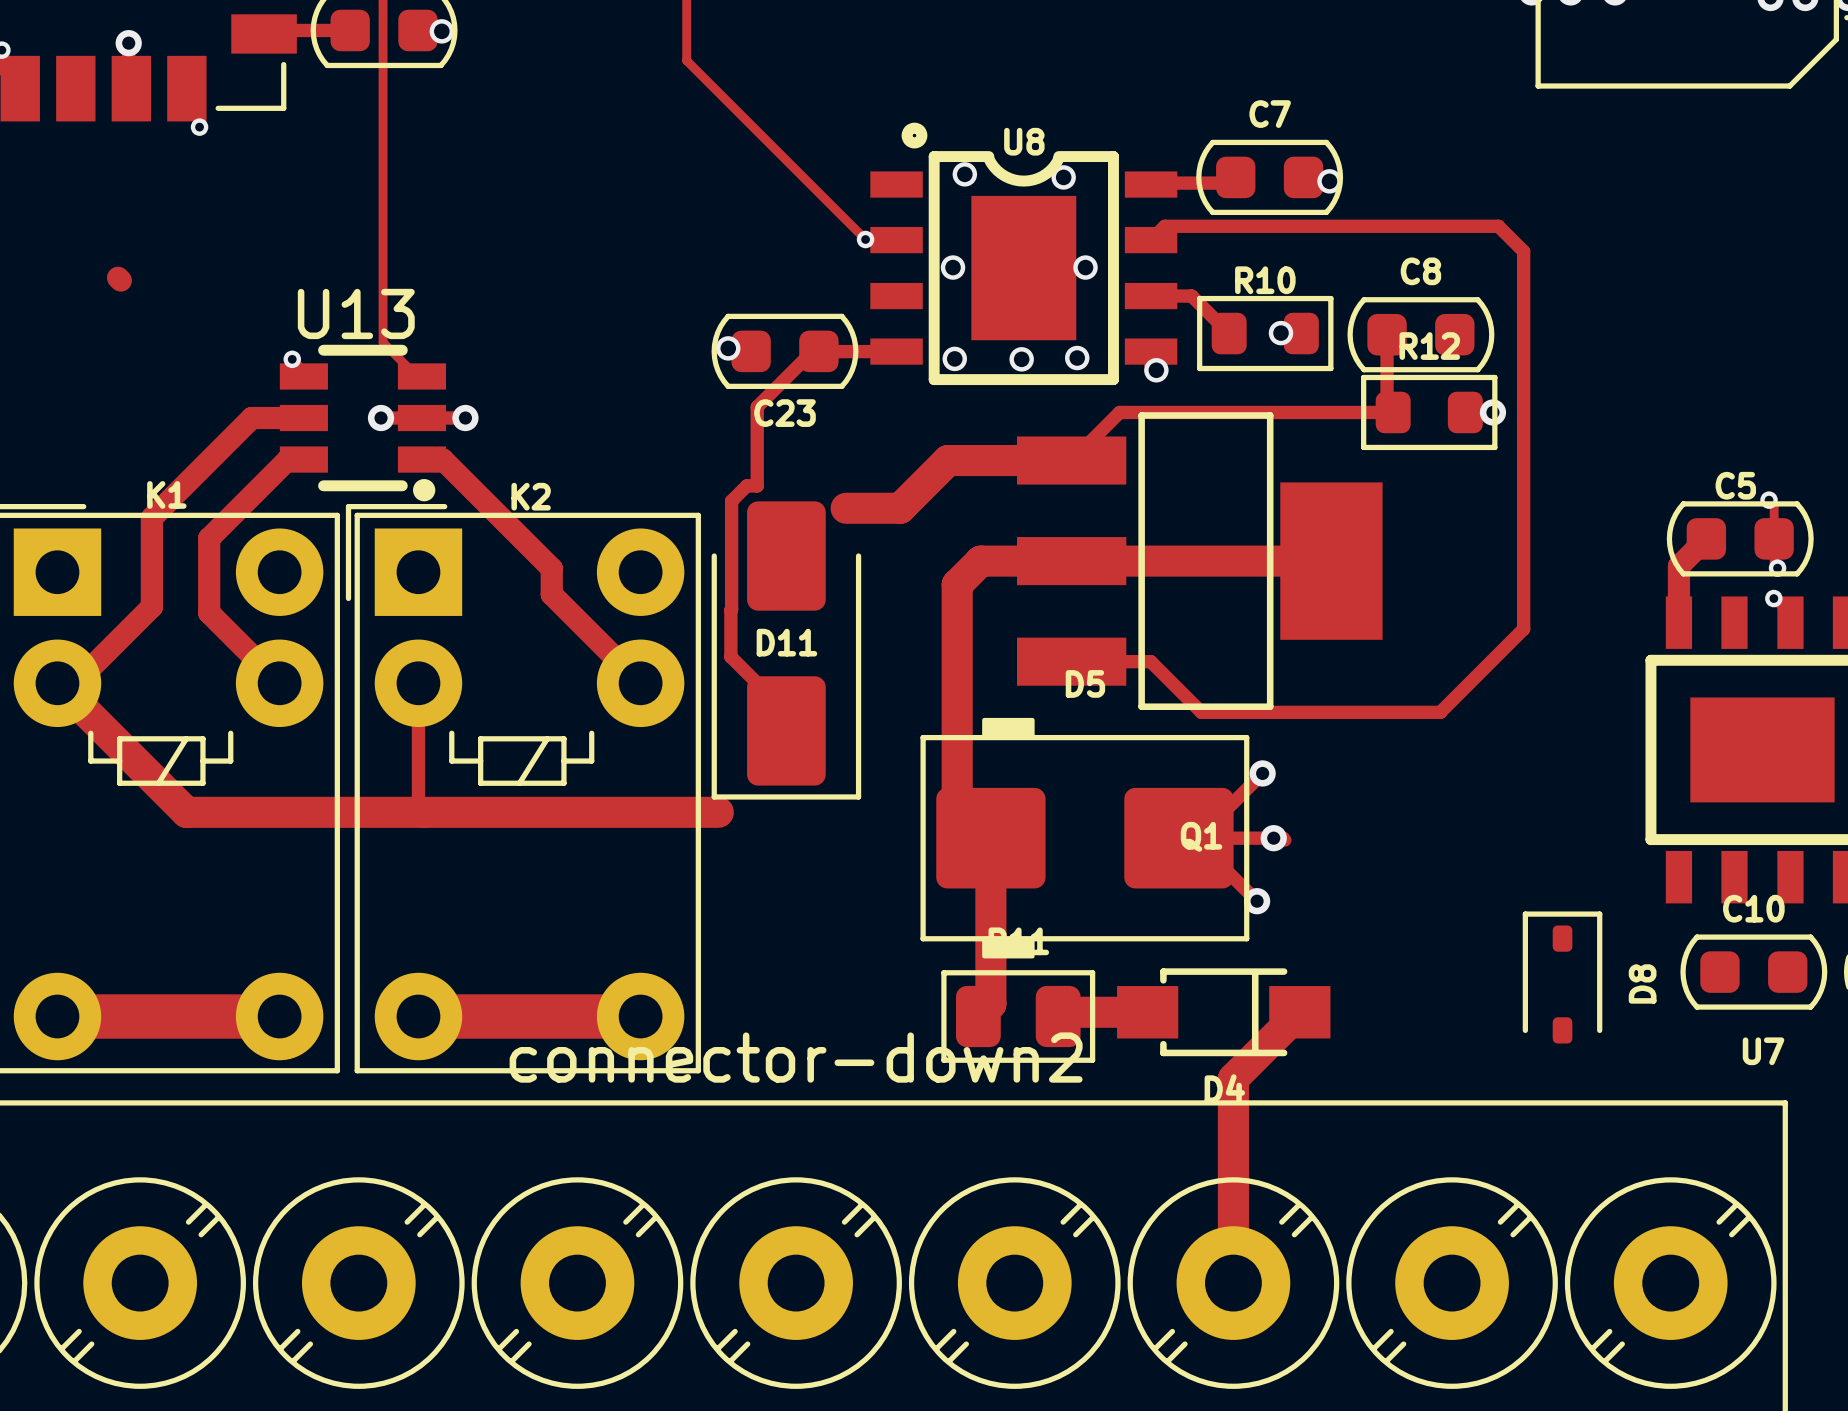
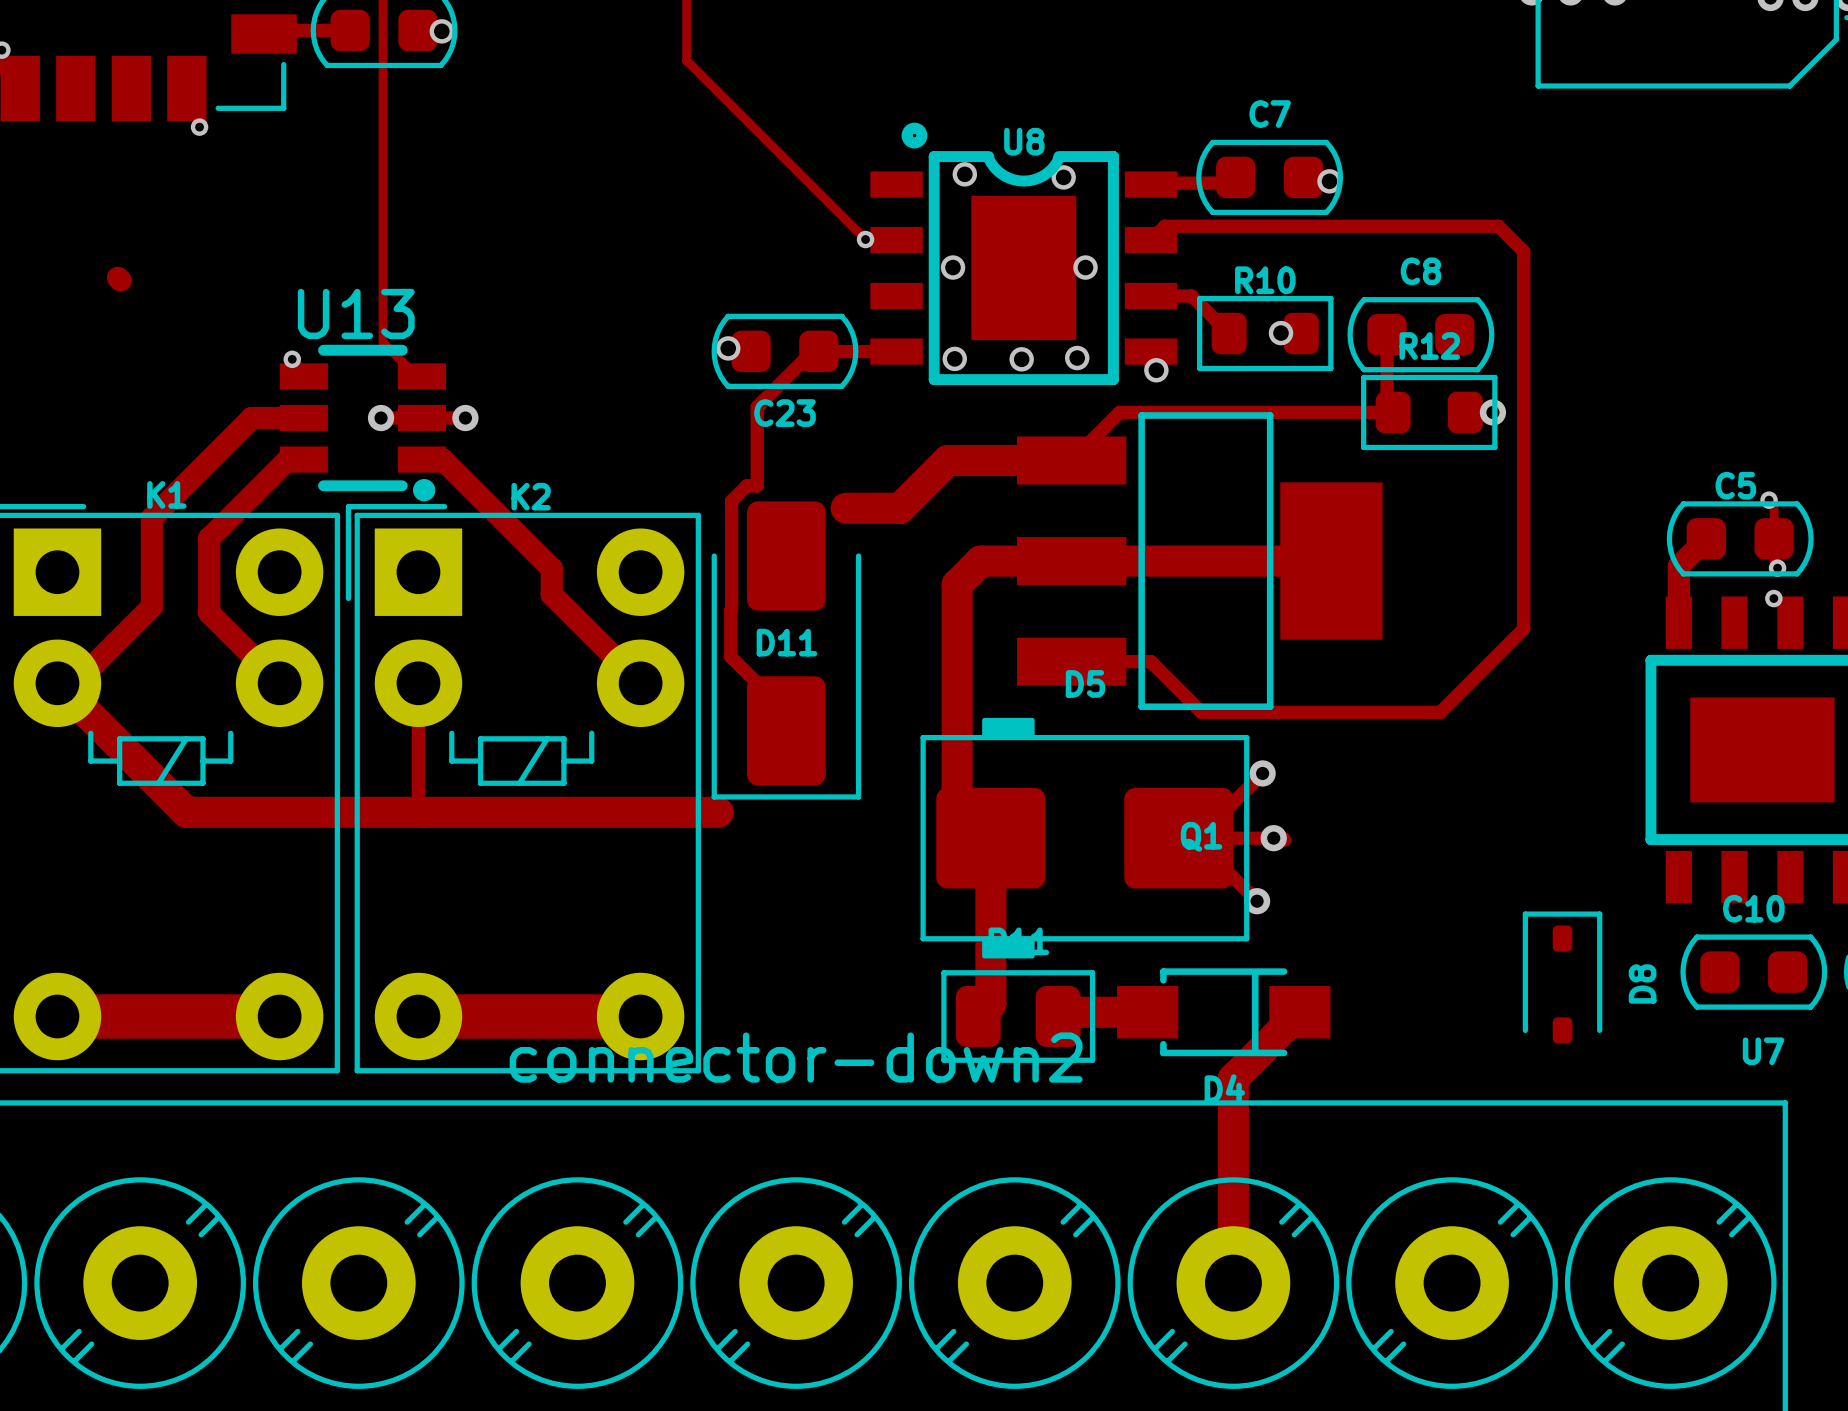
via: (128, 43) -> none

